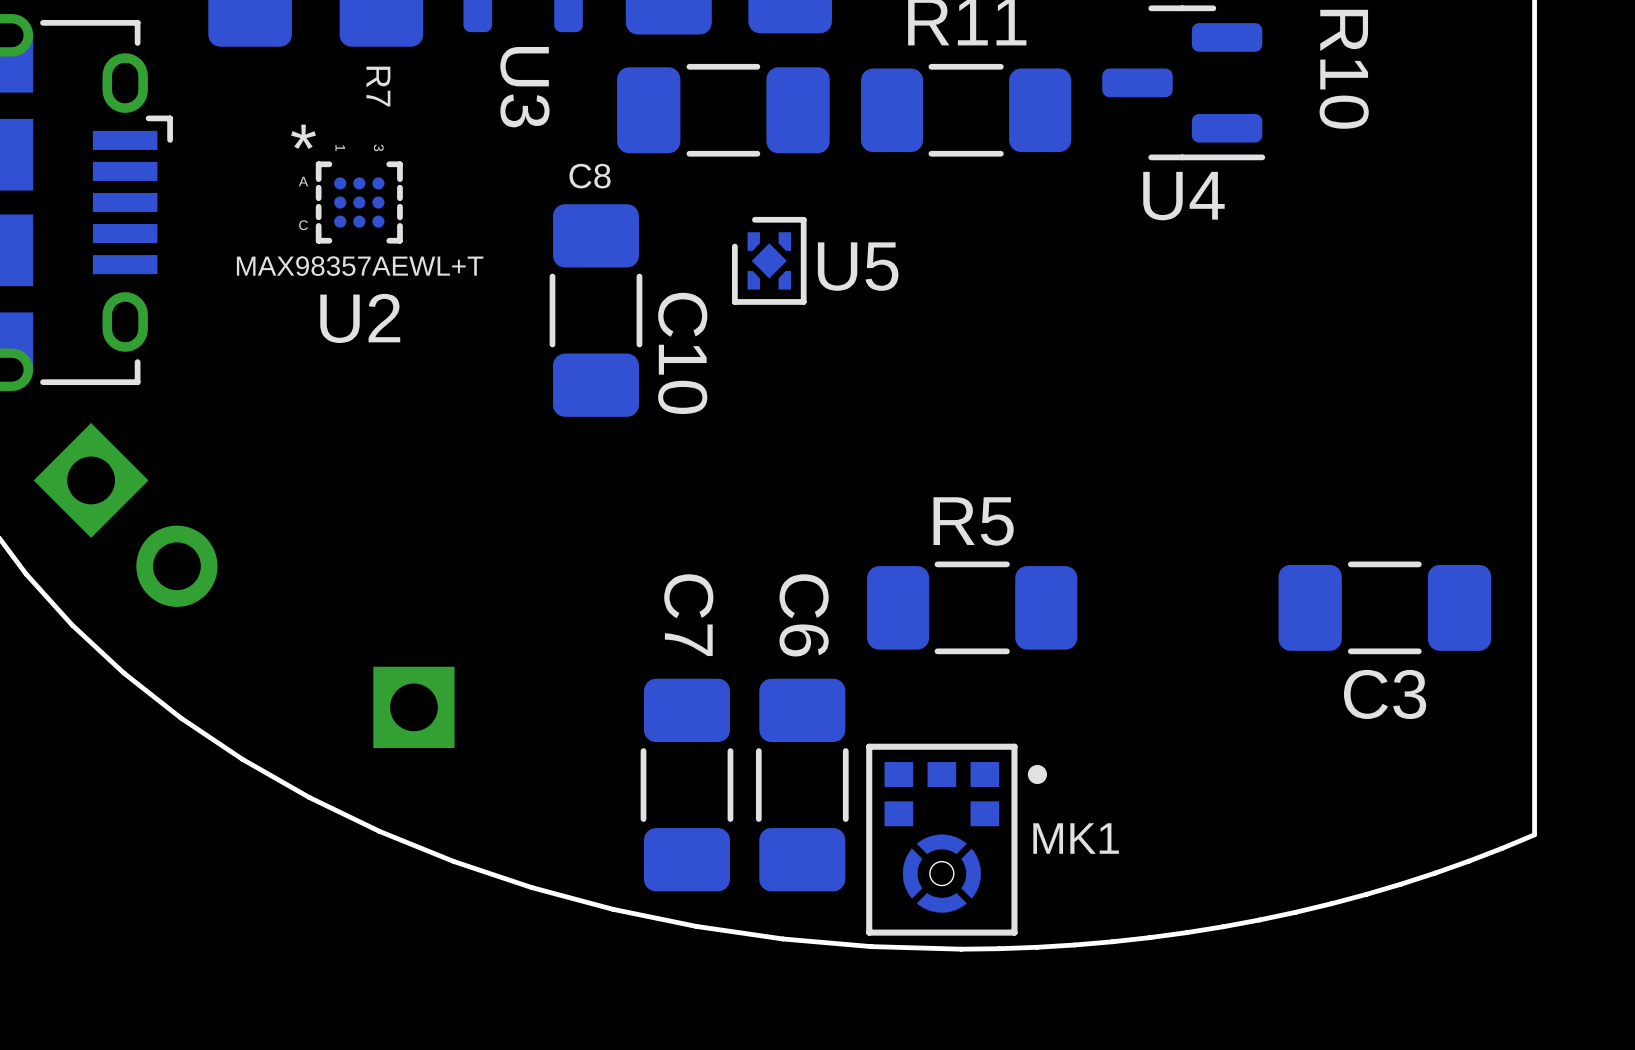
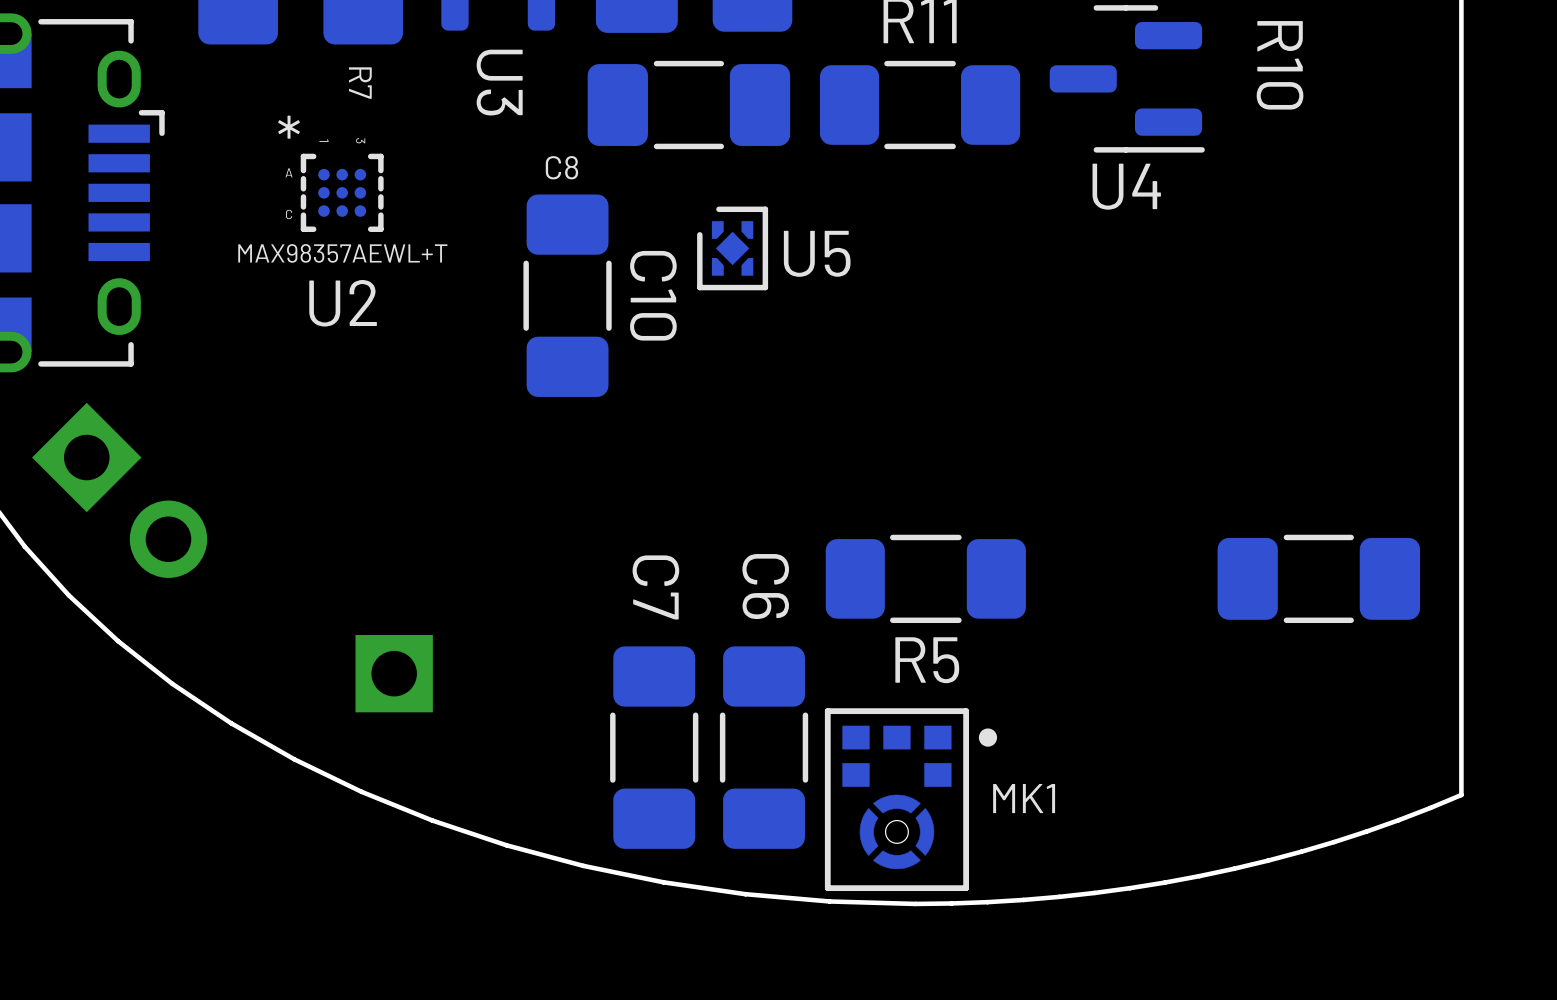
C10 name position: C10 (682, 353) -> C10 (653, 295)
R5 name position: R5 (973, 521) -> R5 (927, 660)
C3 name: C3 (1385, 694) -> none

